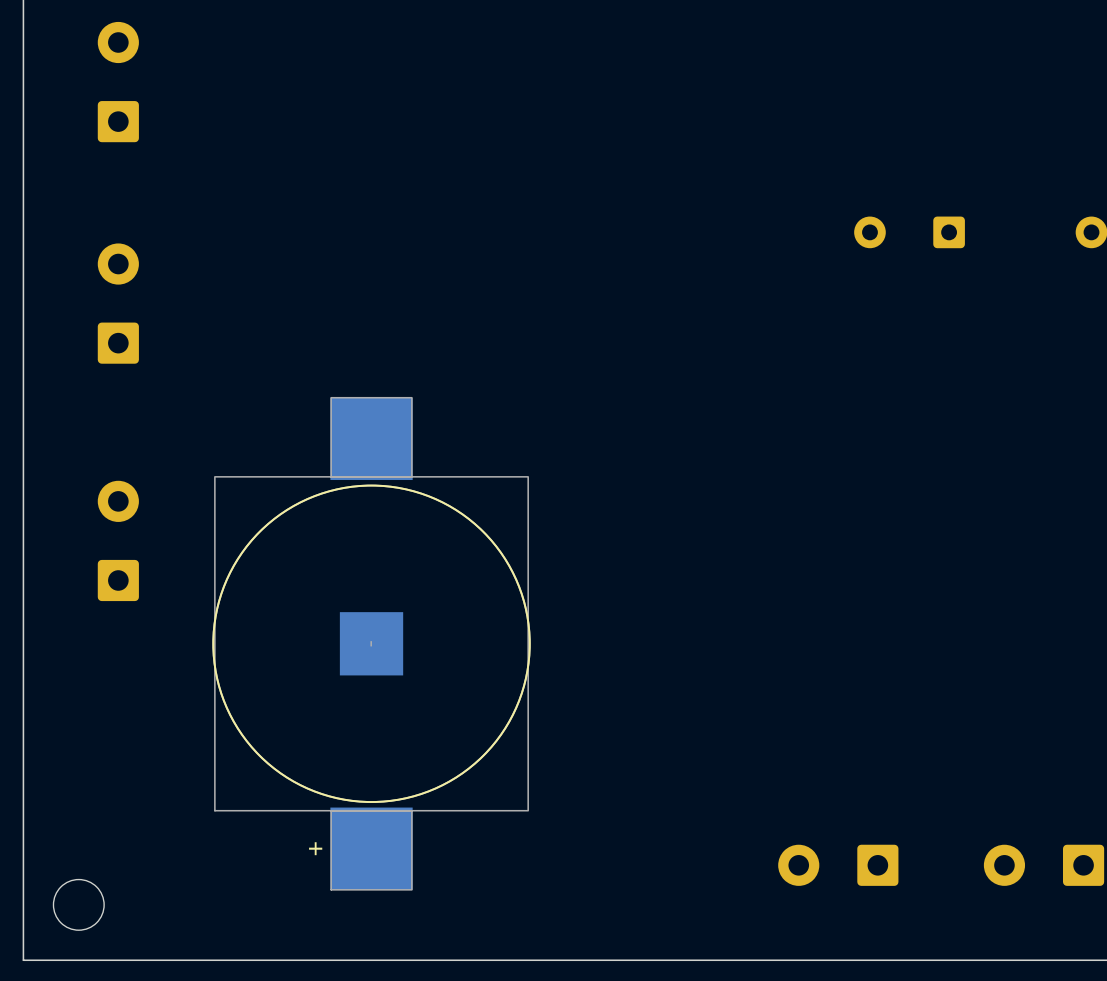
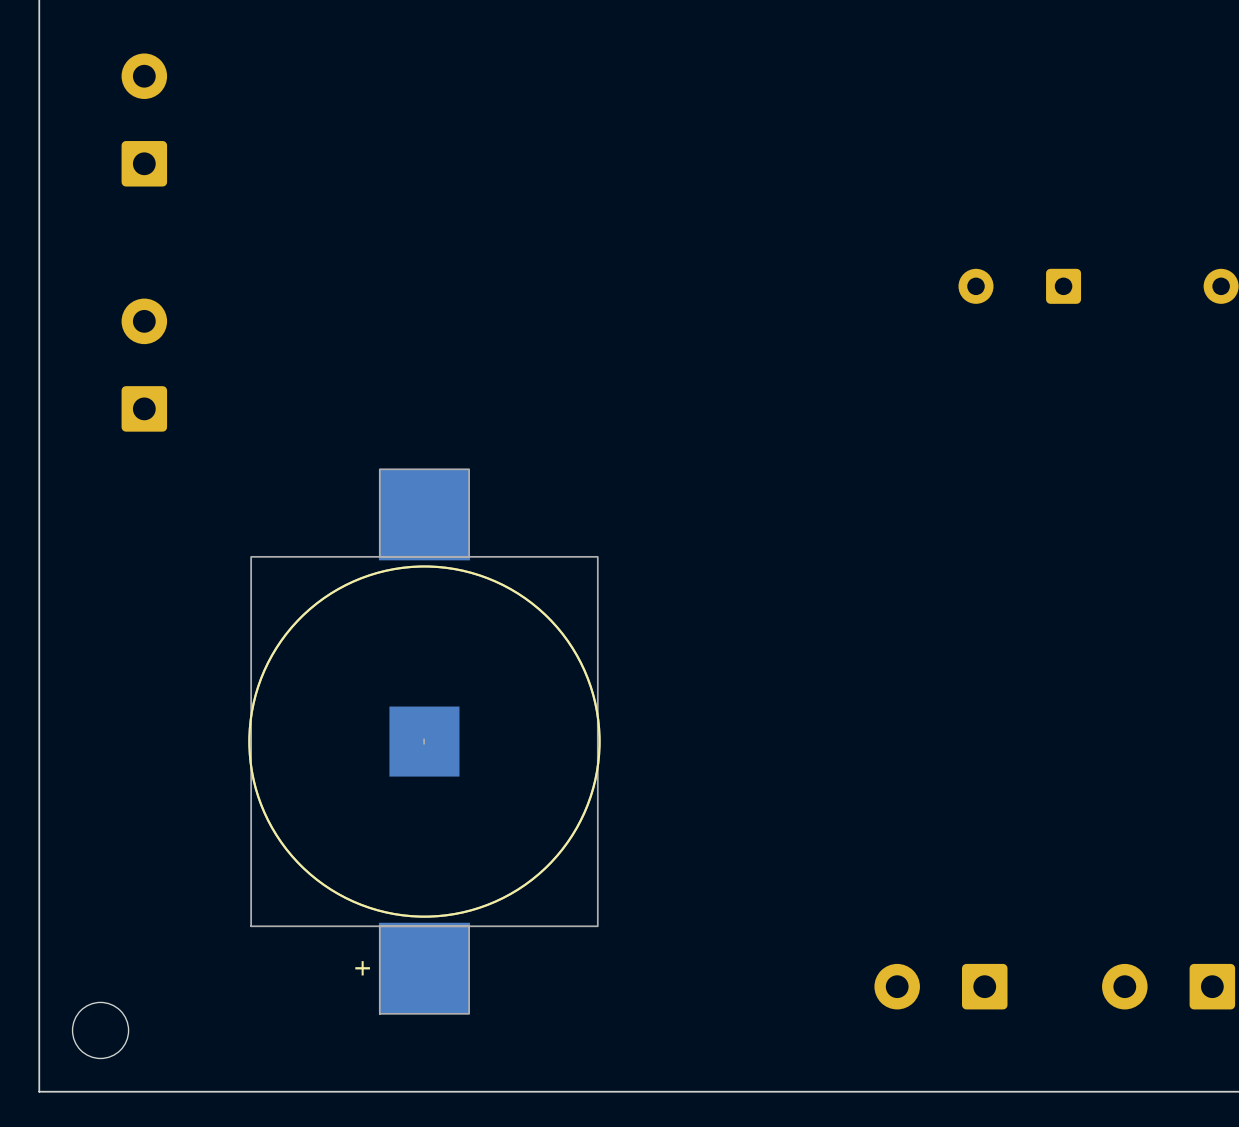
part: (118, 540) -> none

